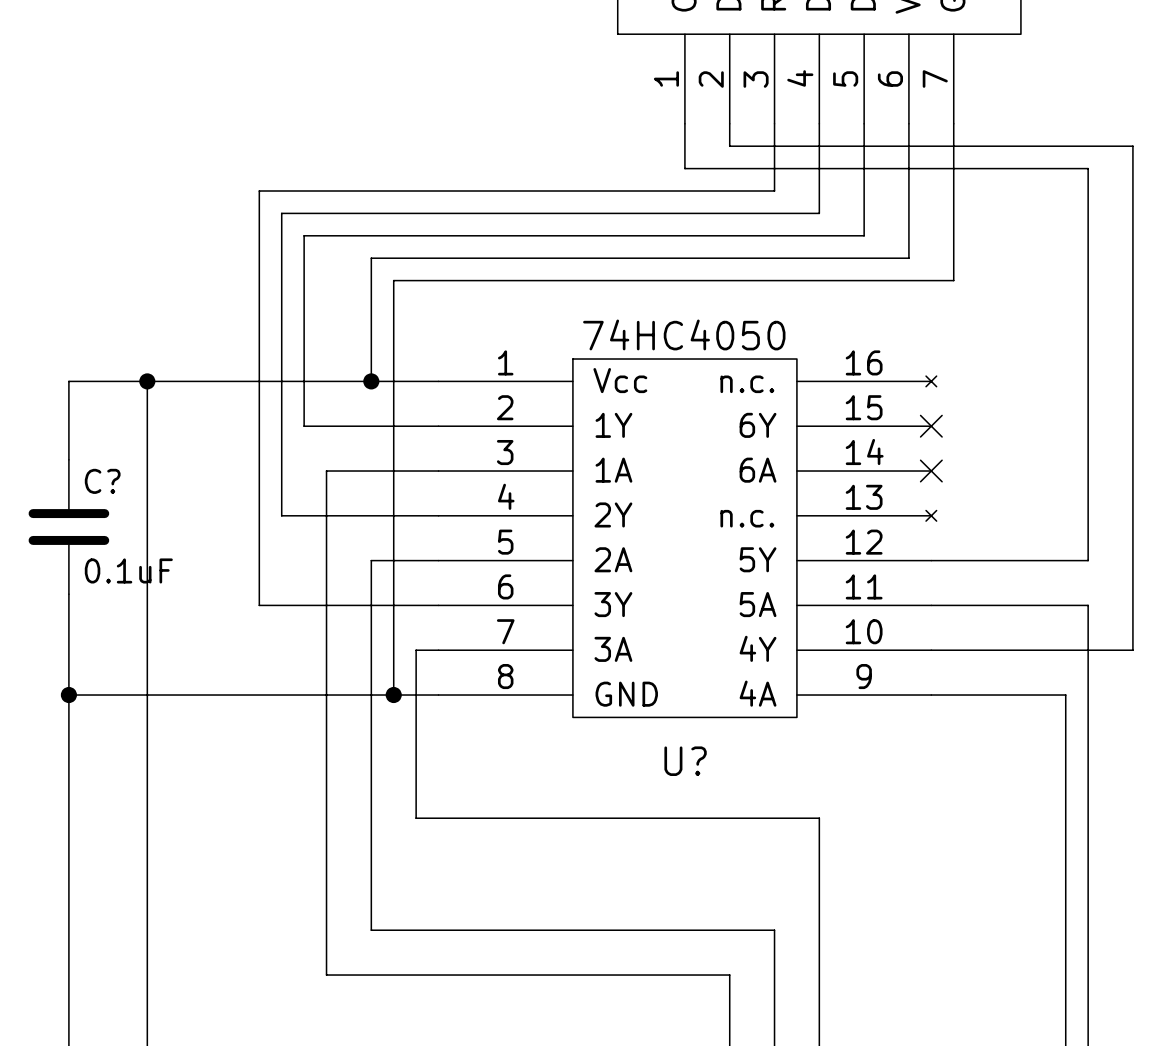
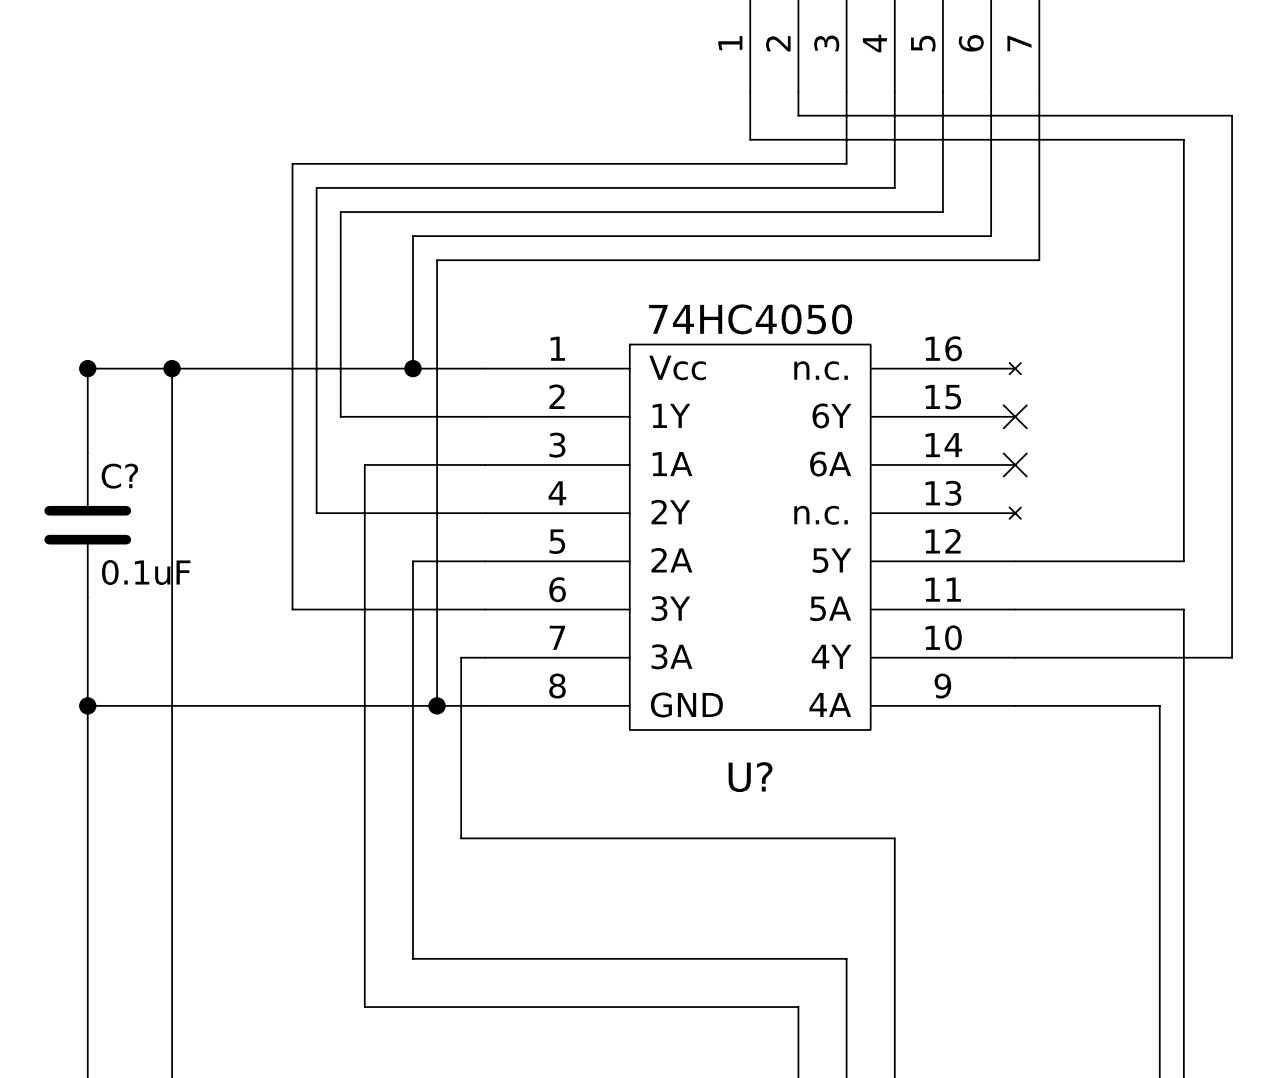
junction: none -> (87, 368)

